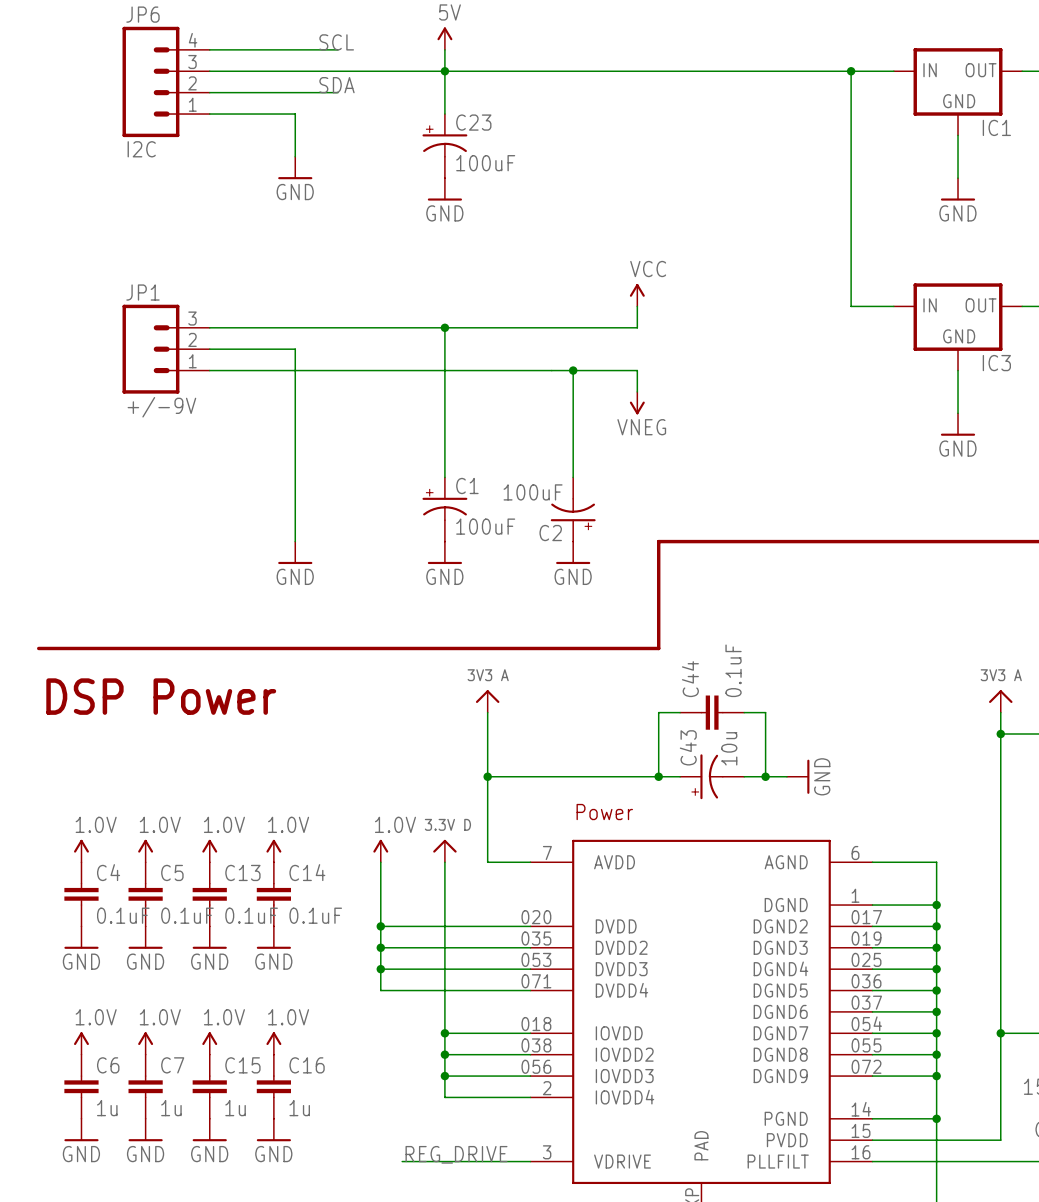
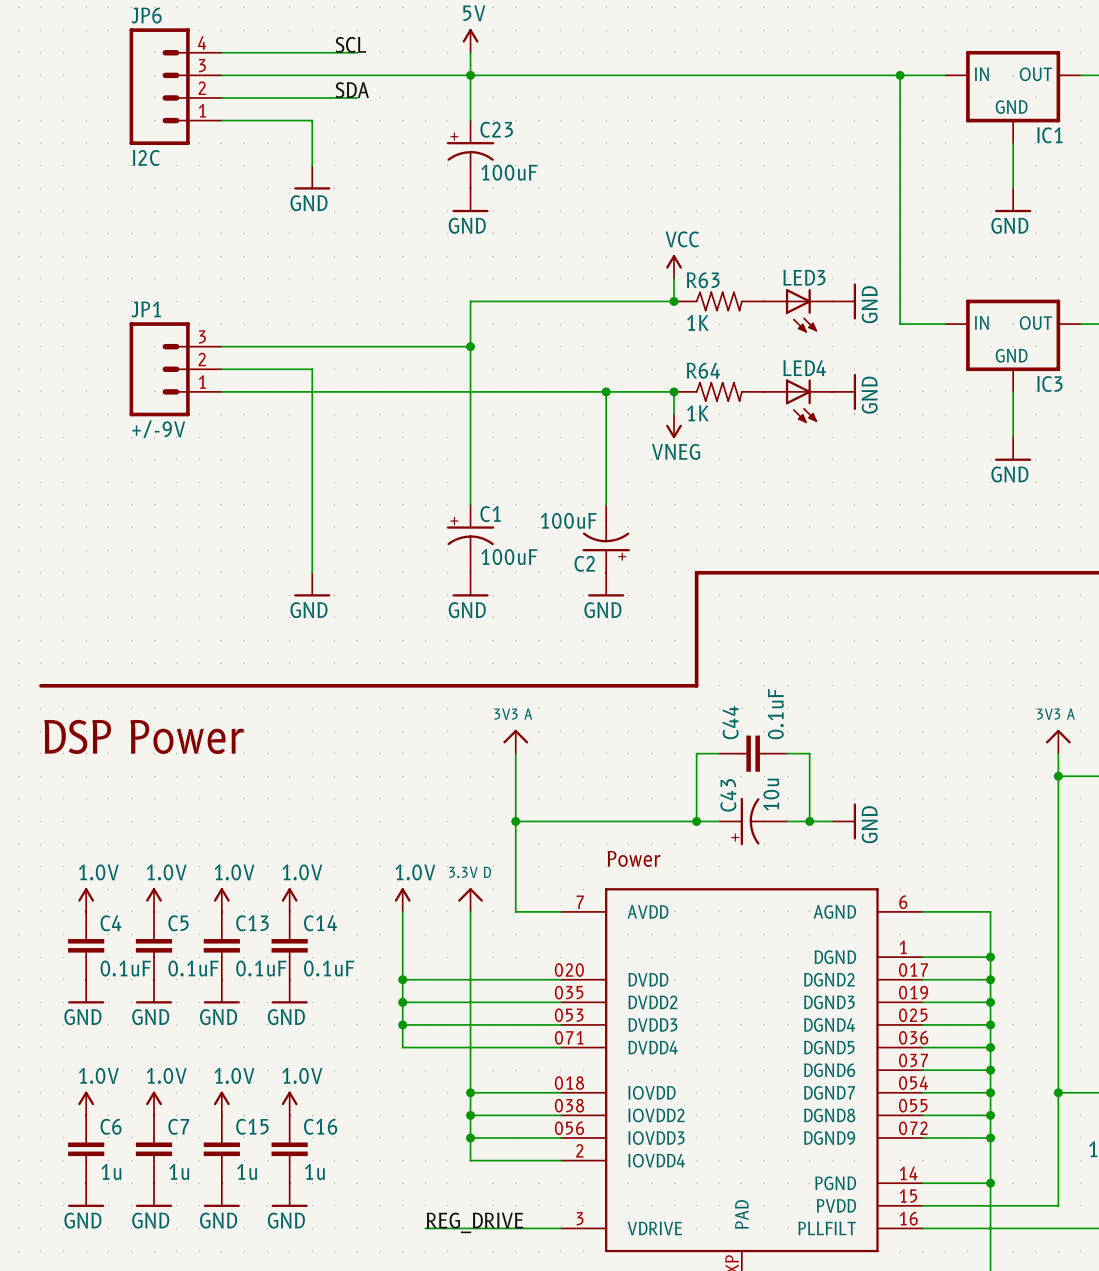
junction: none -> (674, 301)
R63: none -> 1K (719, 301)
power symbol: none -> GND (844, 301)
LED3: none -> (798, 310)
power symbol position: VCC (637, 295) -> VCC (674, 266)
wire: (637, 306) (637, 327) (444, 327) -> (674, 278) (674, 301) (470, 301) (470, 346)
junction: none -> (674, 391)
R64: none -> 1K (719, 391)
power symbol: none -> GND (844, 391)
LED4: none -> (798, 401)

